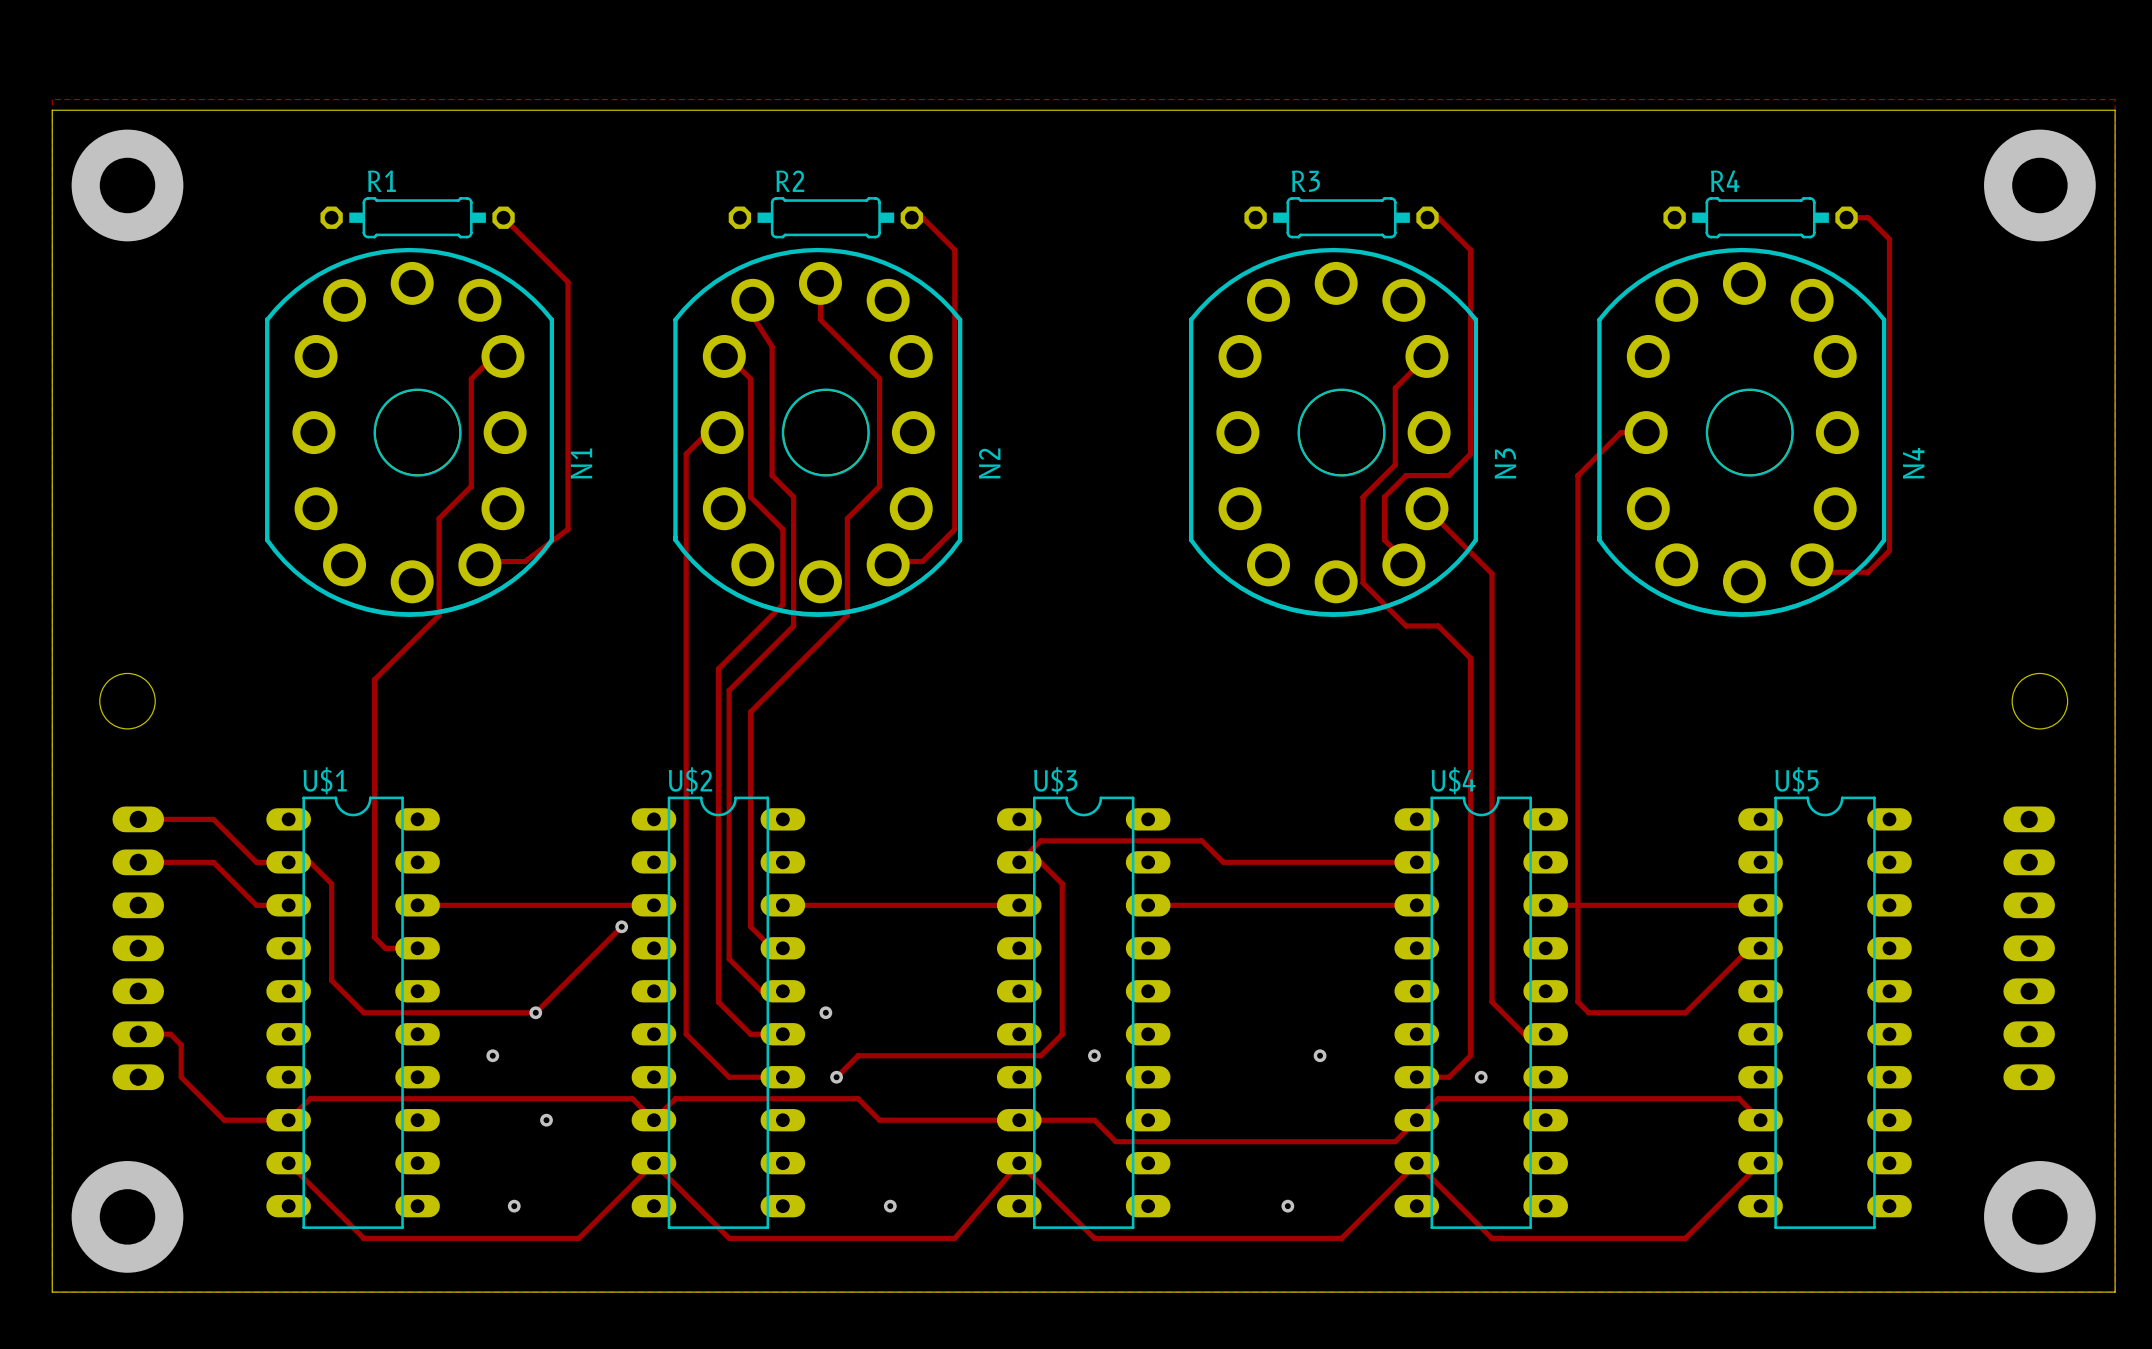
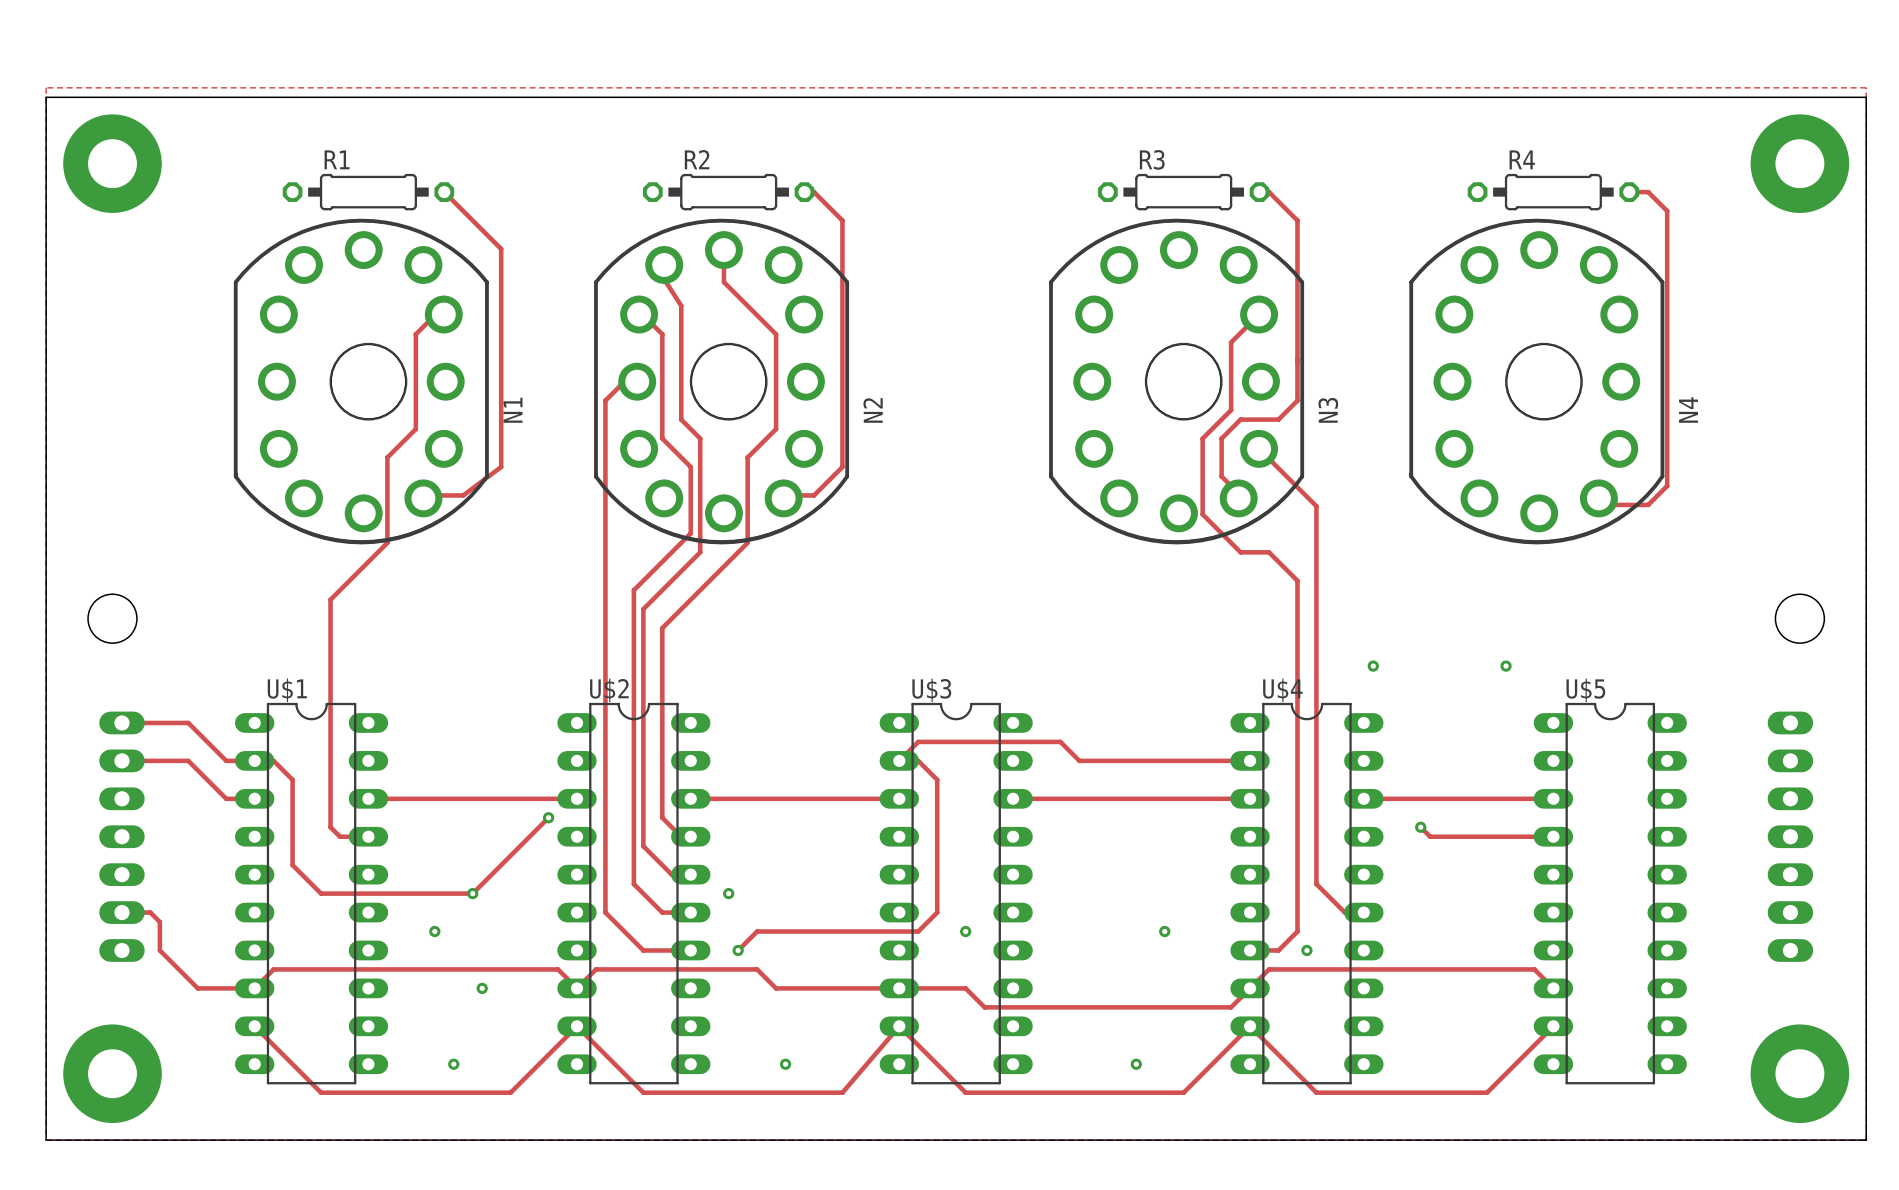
track: (1646, 432) (1620, 432) (1577, 475) (1577, 1002) (1588, 1012) (1685, 1012) (1749, 948) -> (1420, 827) (1430, 836) (1543, 836)
via: none -> (1373, 666)
via: none -> (1506, 666)
via: none -> (1420, 827)

